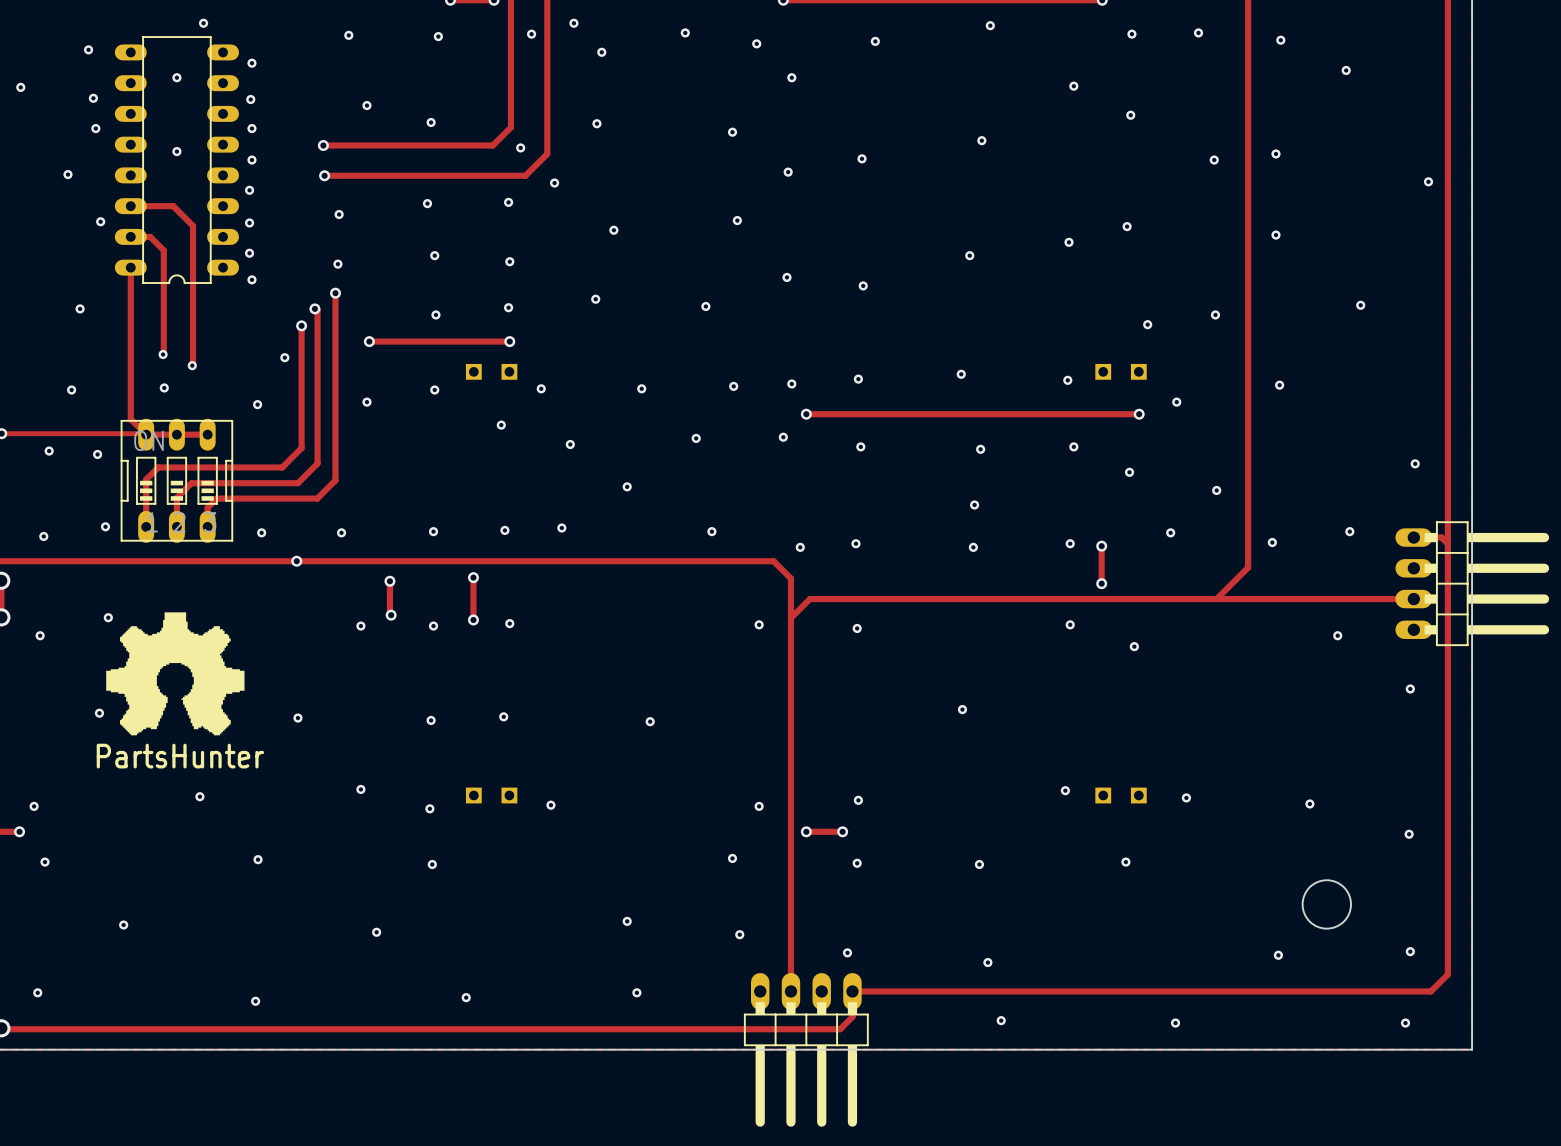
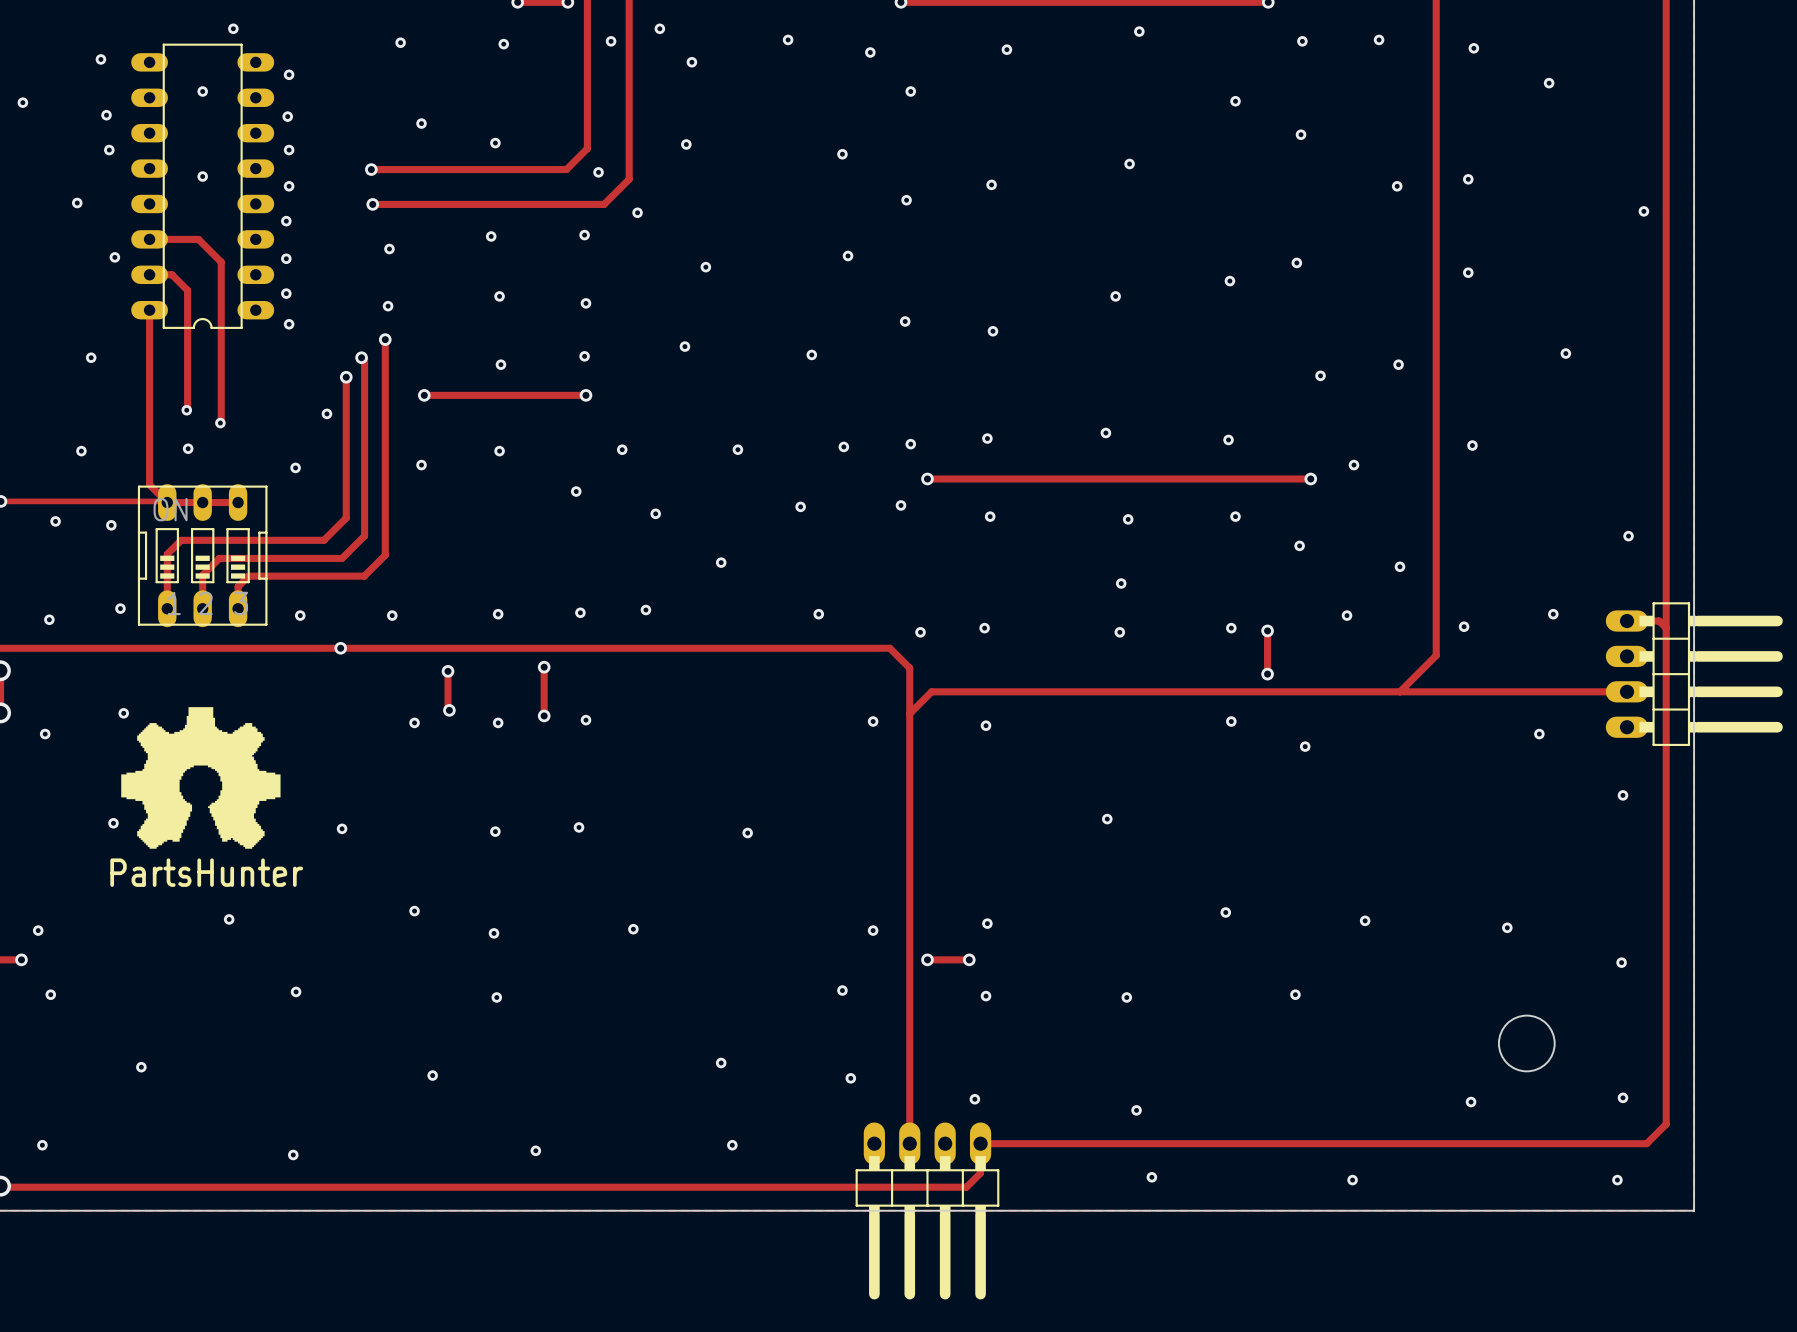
part: (491, 371) -> none
part: (1121, 371) -> none
part: (491, 795) -> none
part: (1121, 795) -> none

